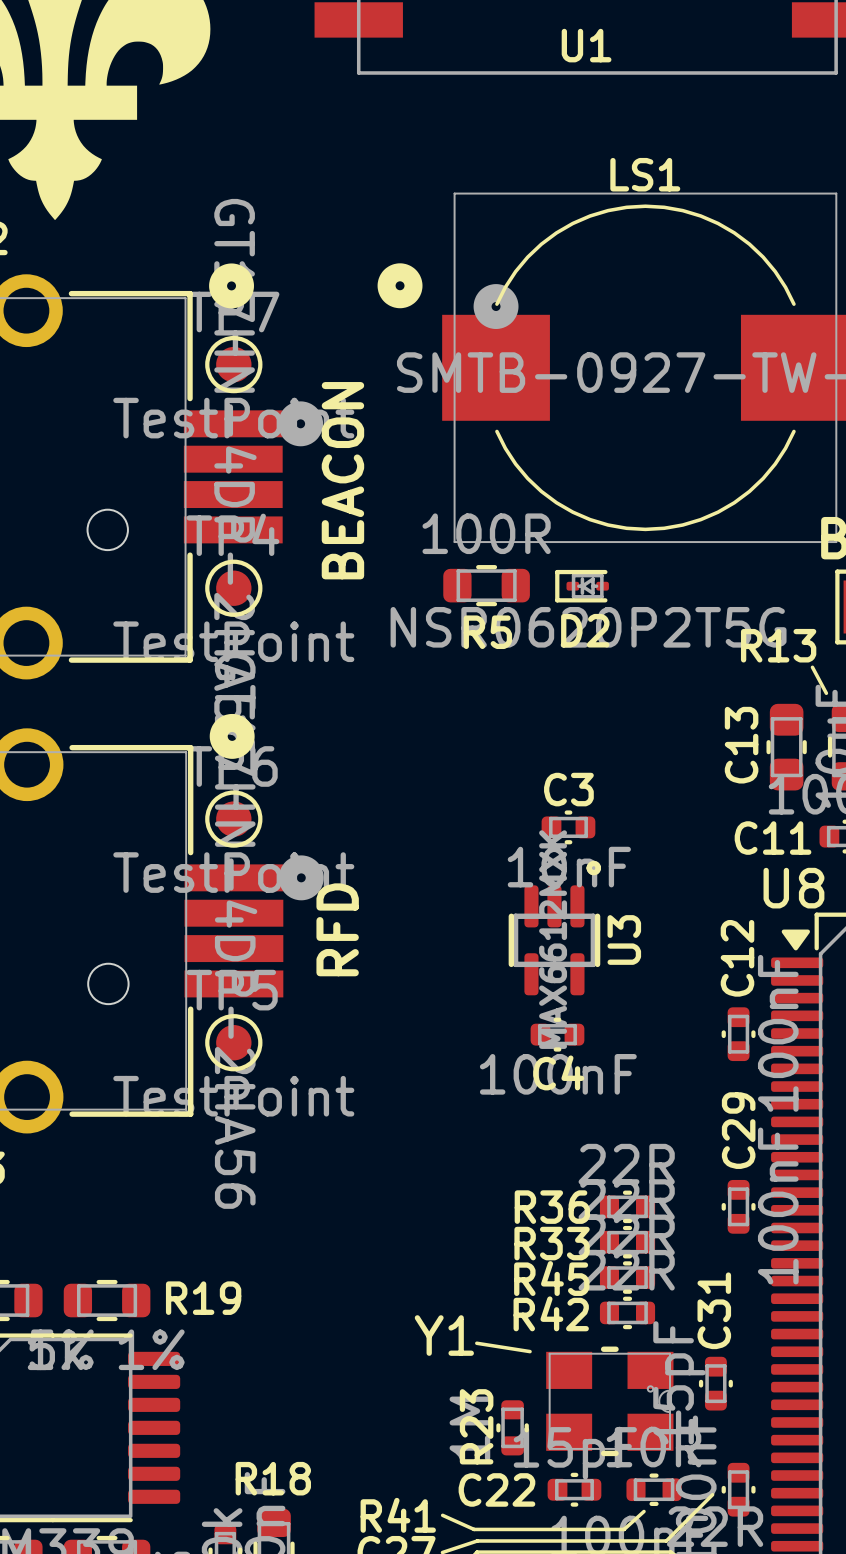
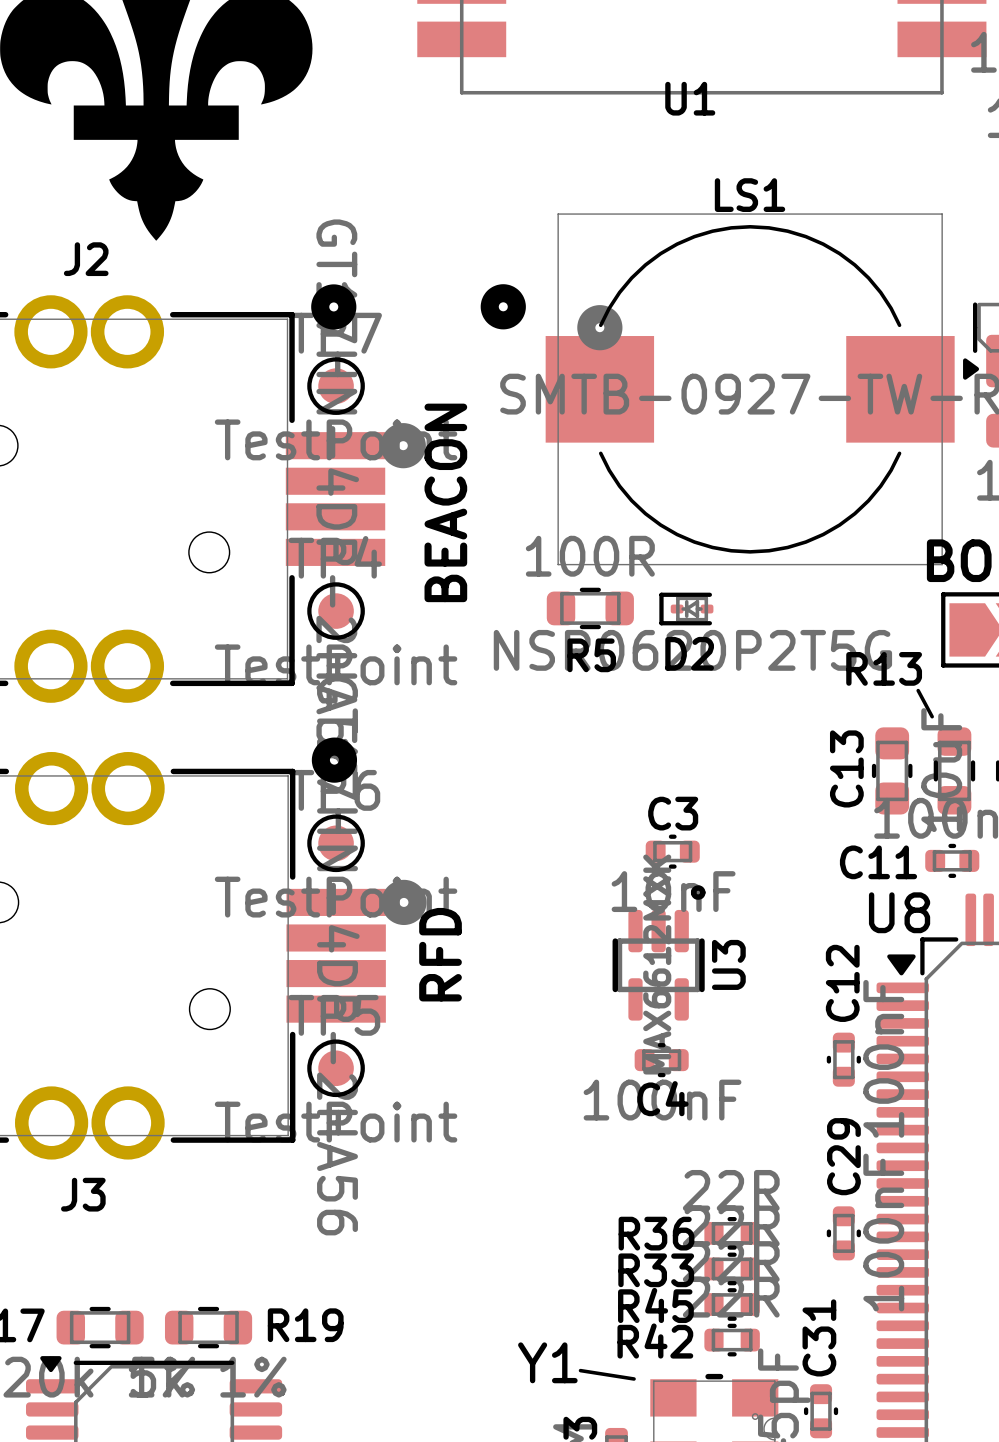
U1 name position: U1 (586, 45) -> U1 (690, 98)

